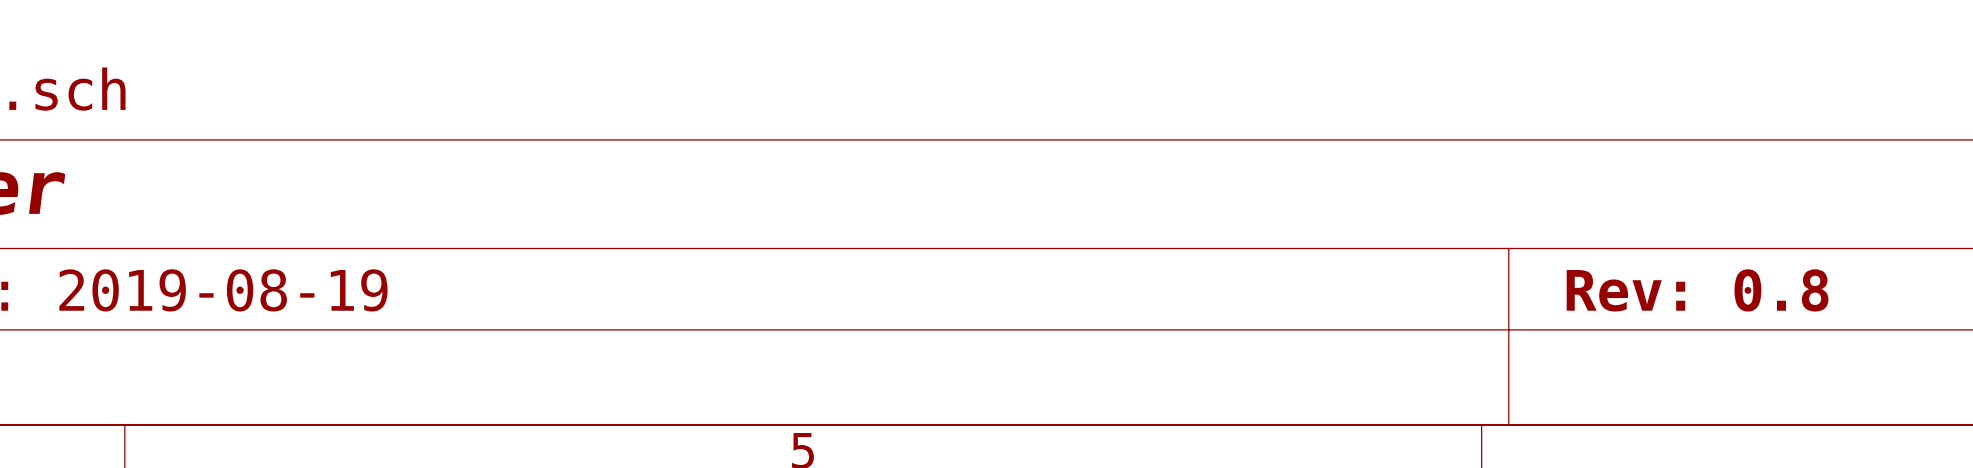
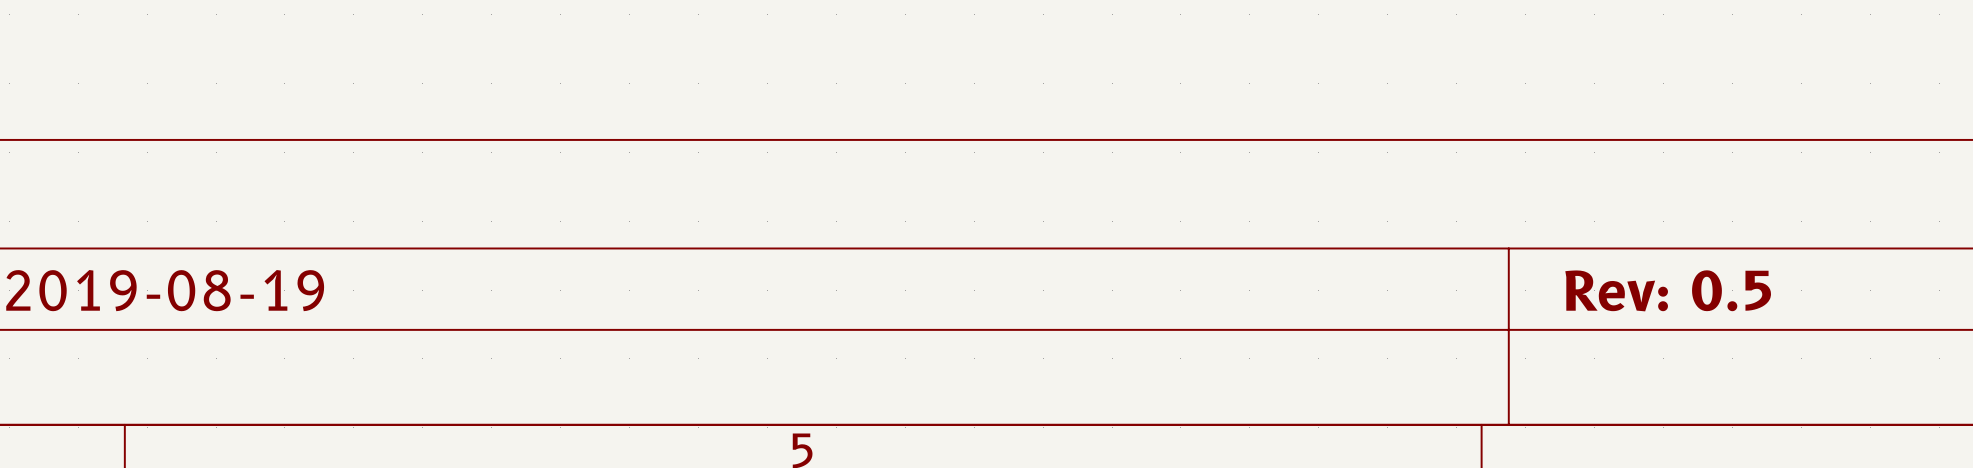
title block: Rev: 0.8 (1697, 290) -> Rev: 0.5 (1668, 290)

